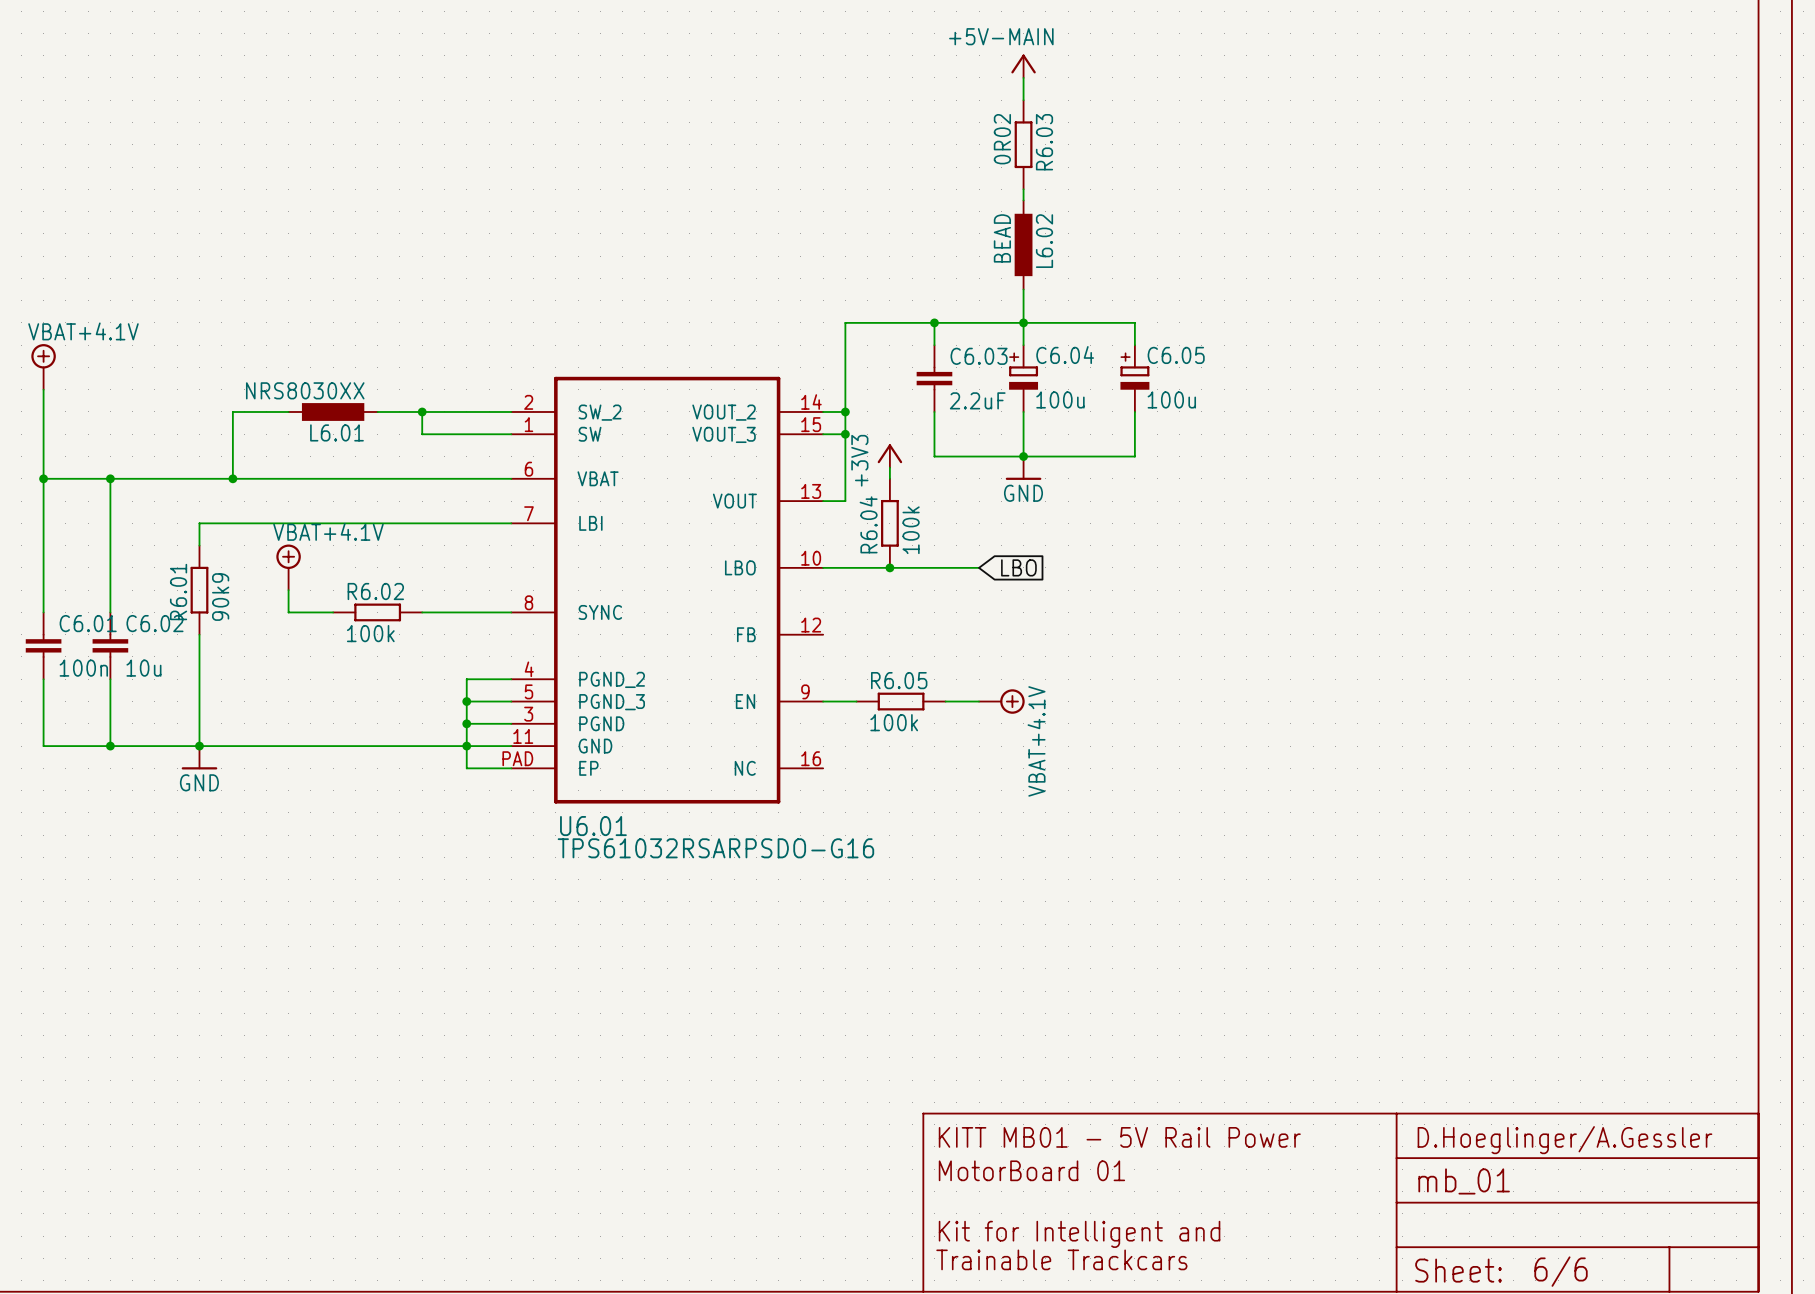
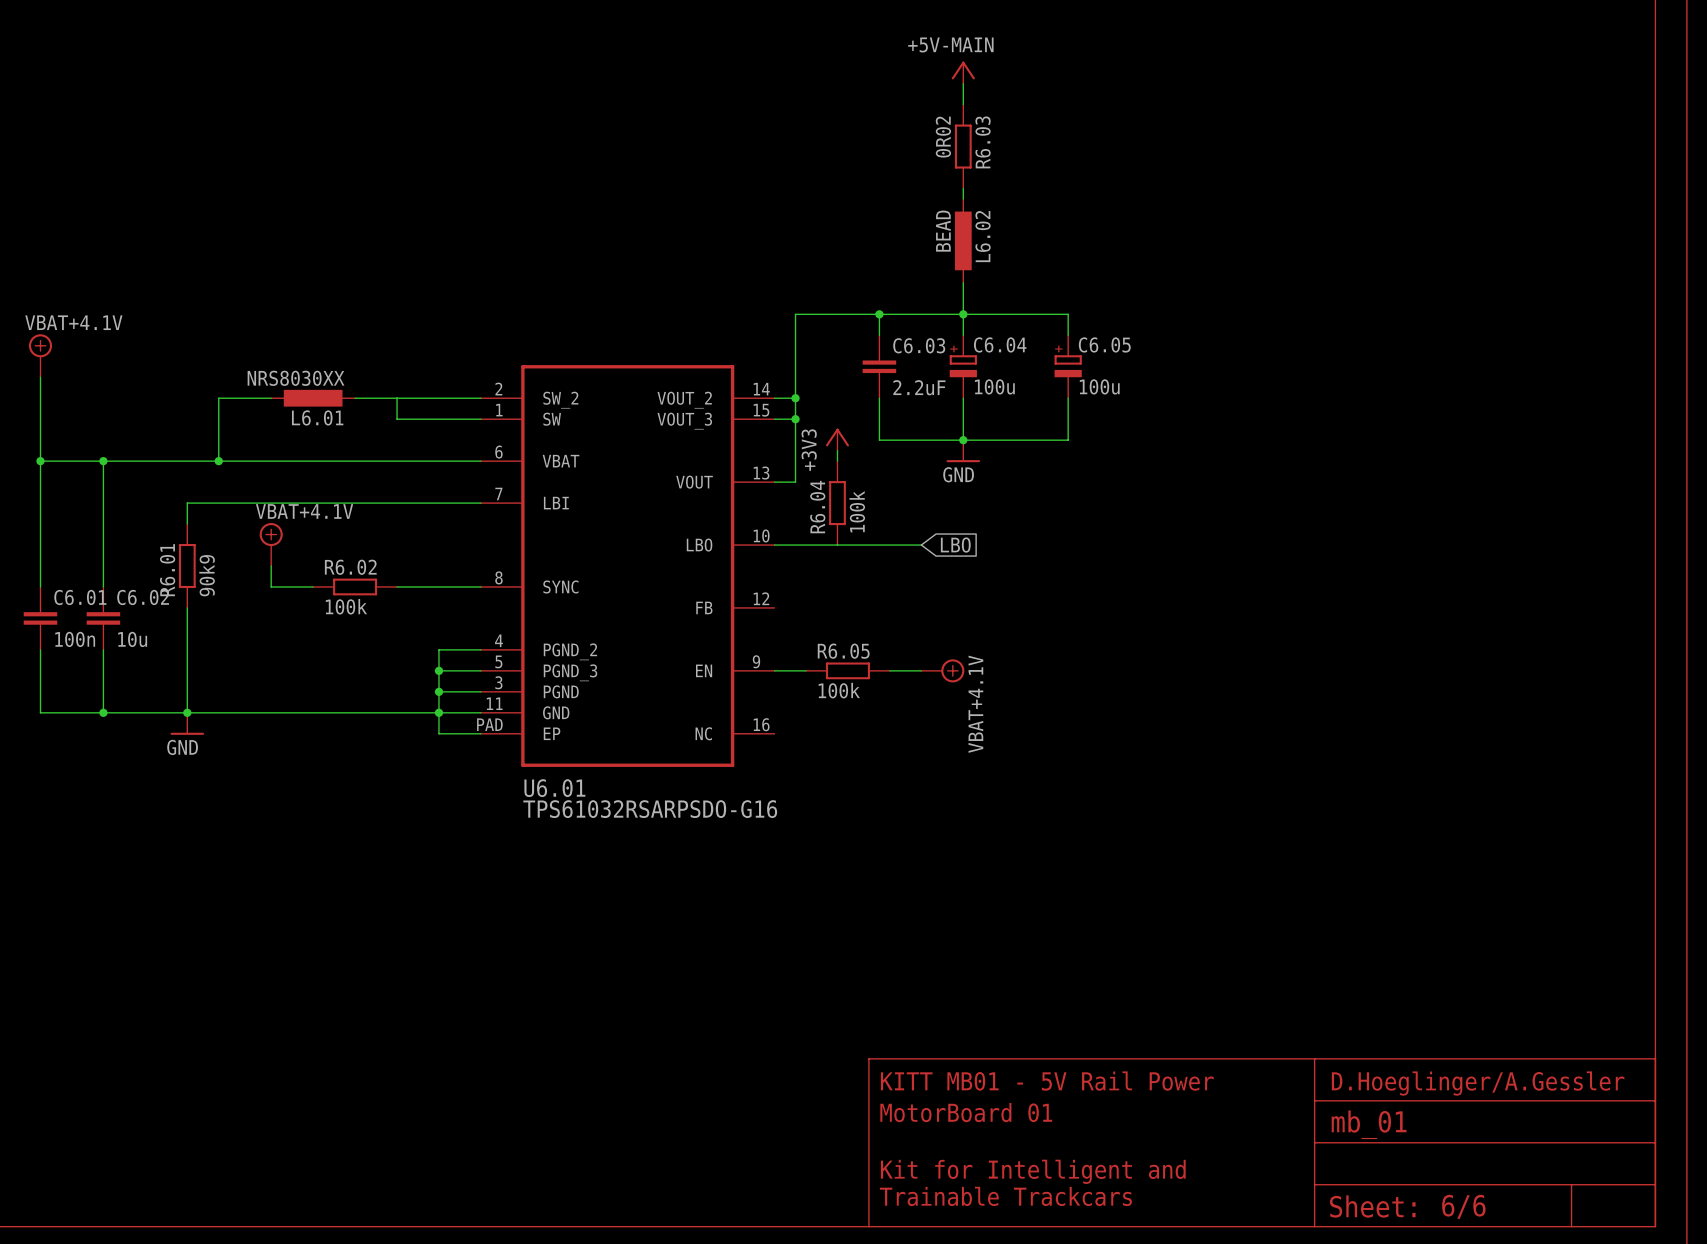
junction: (422, 411) -> none
junction: (889, 567) -> none

